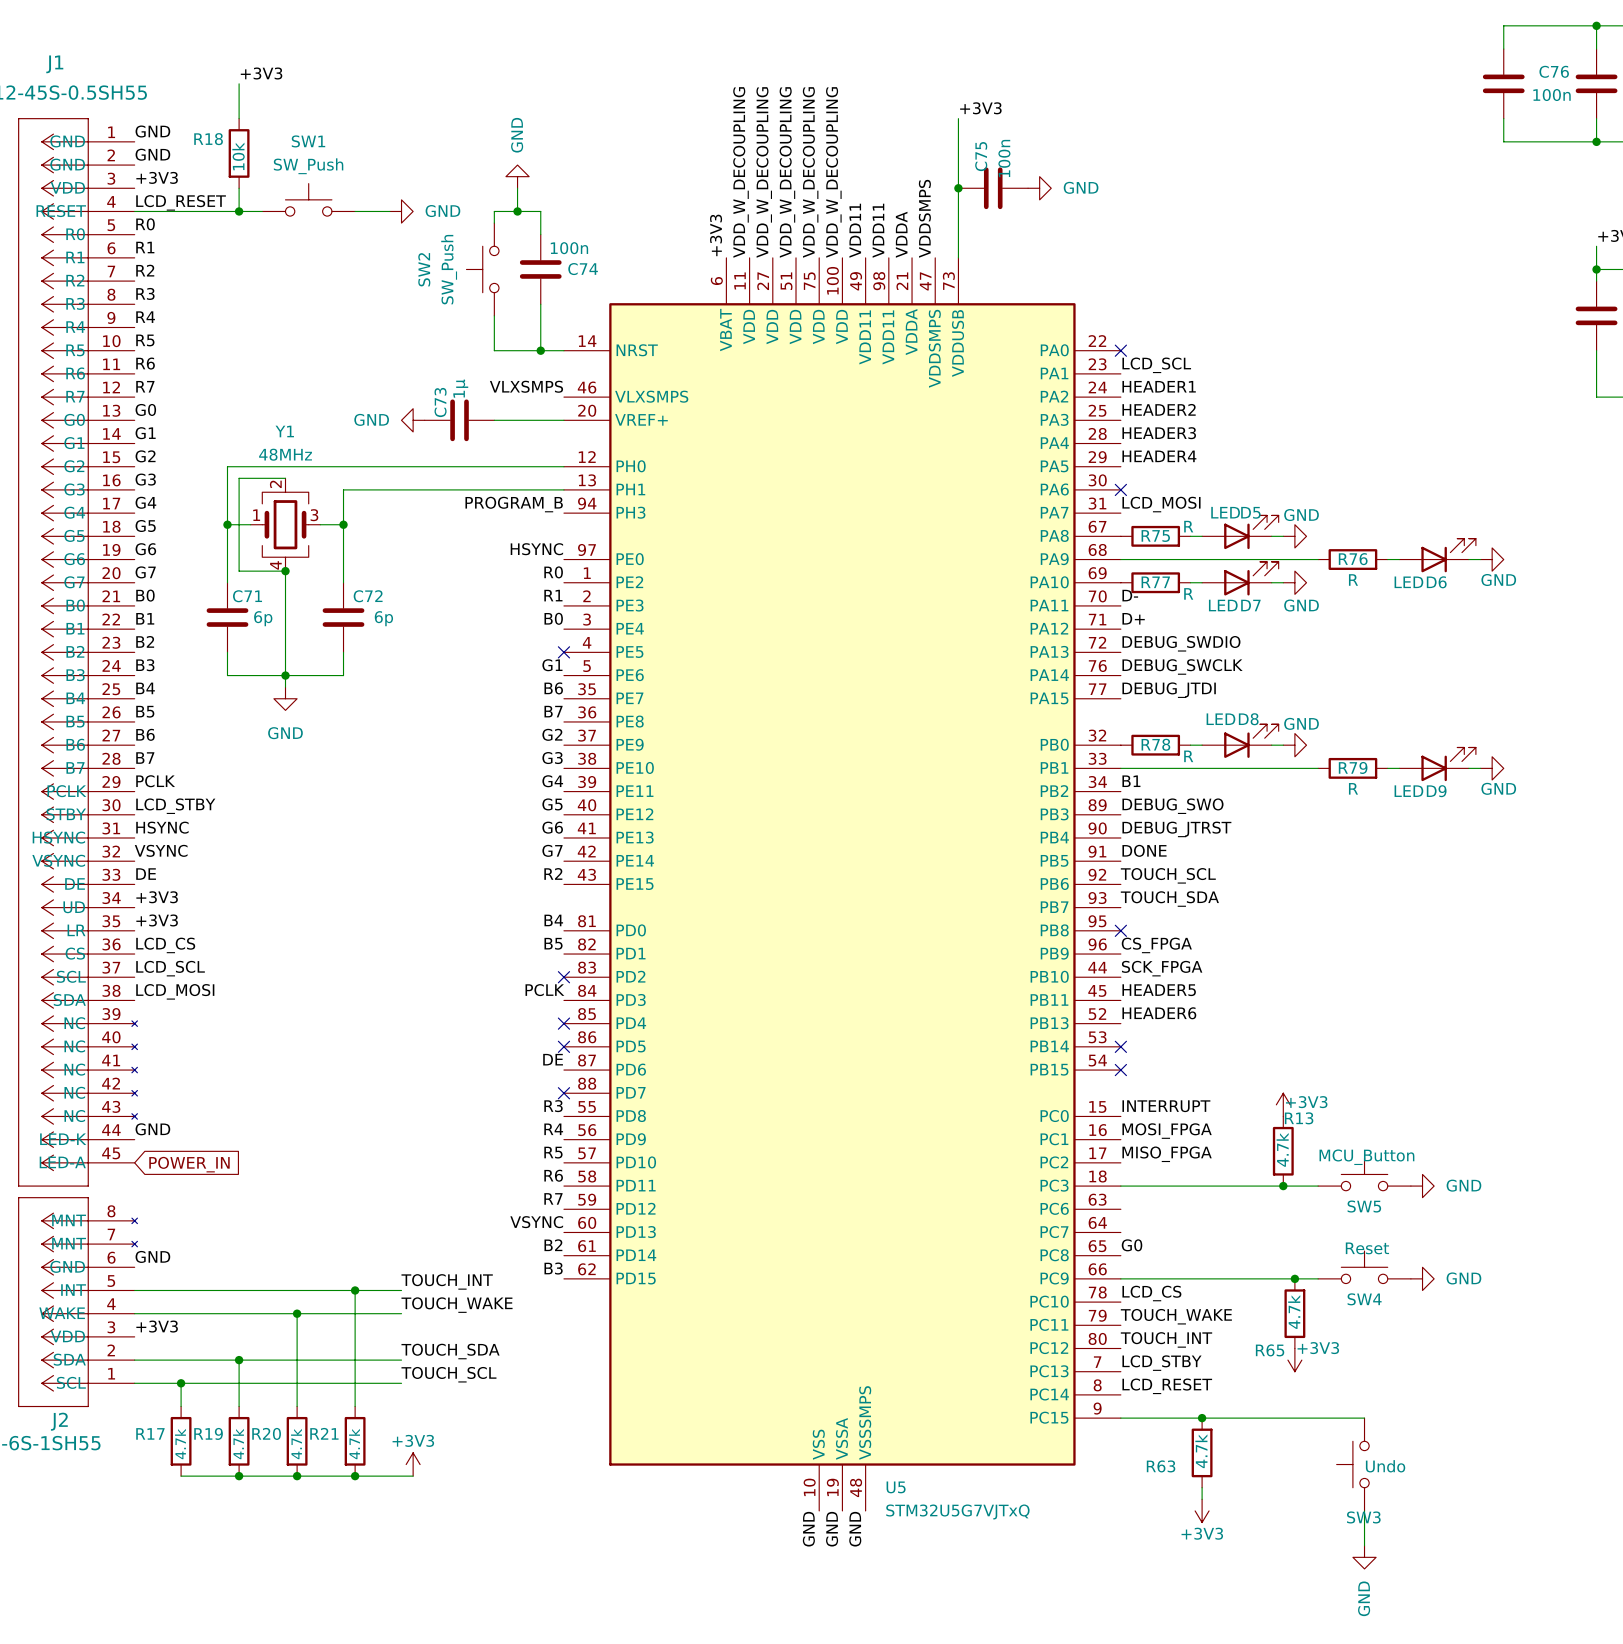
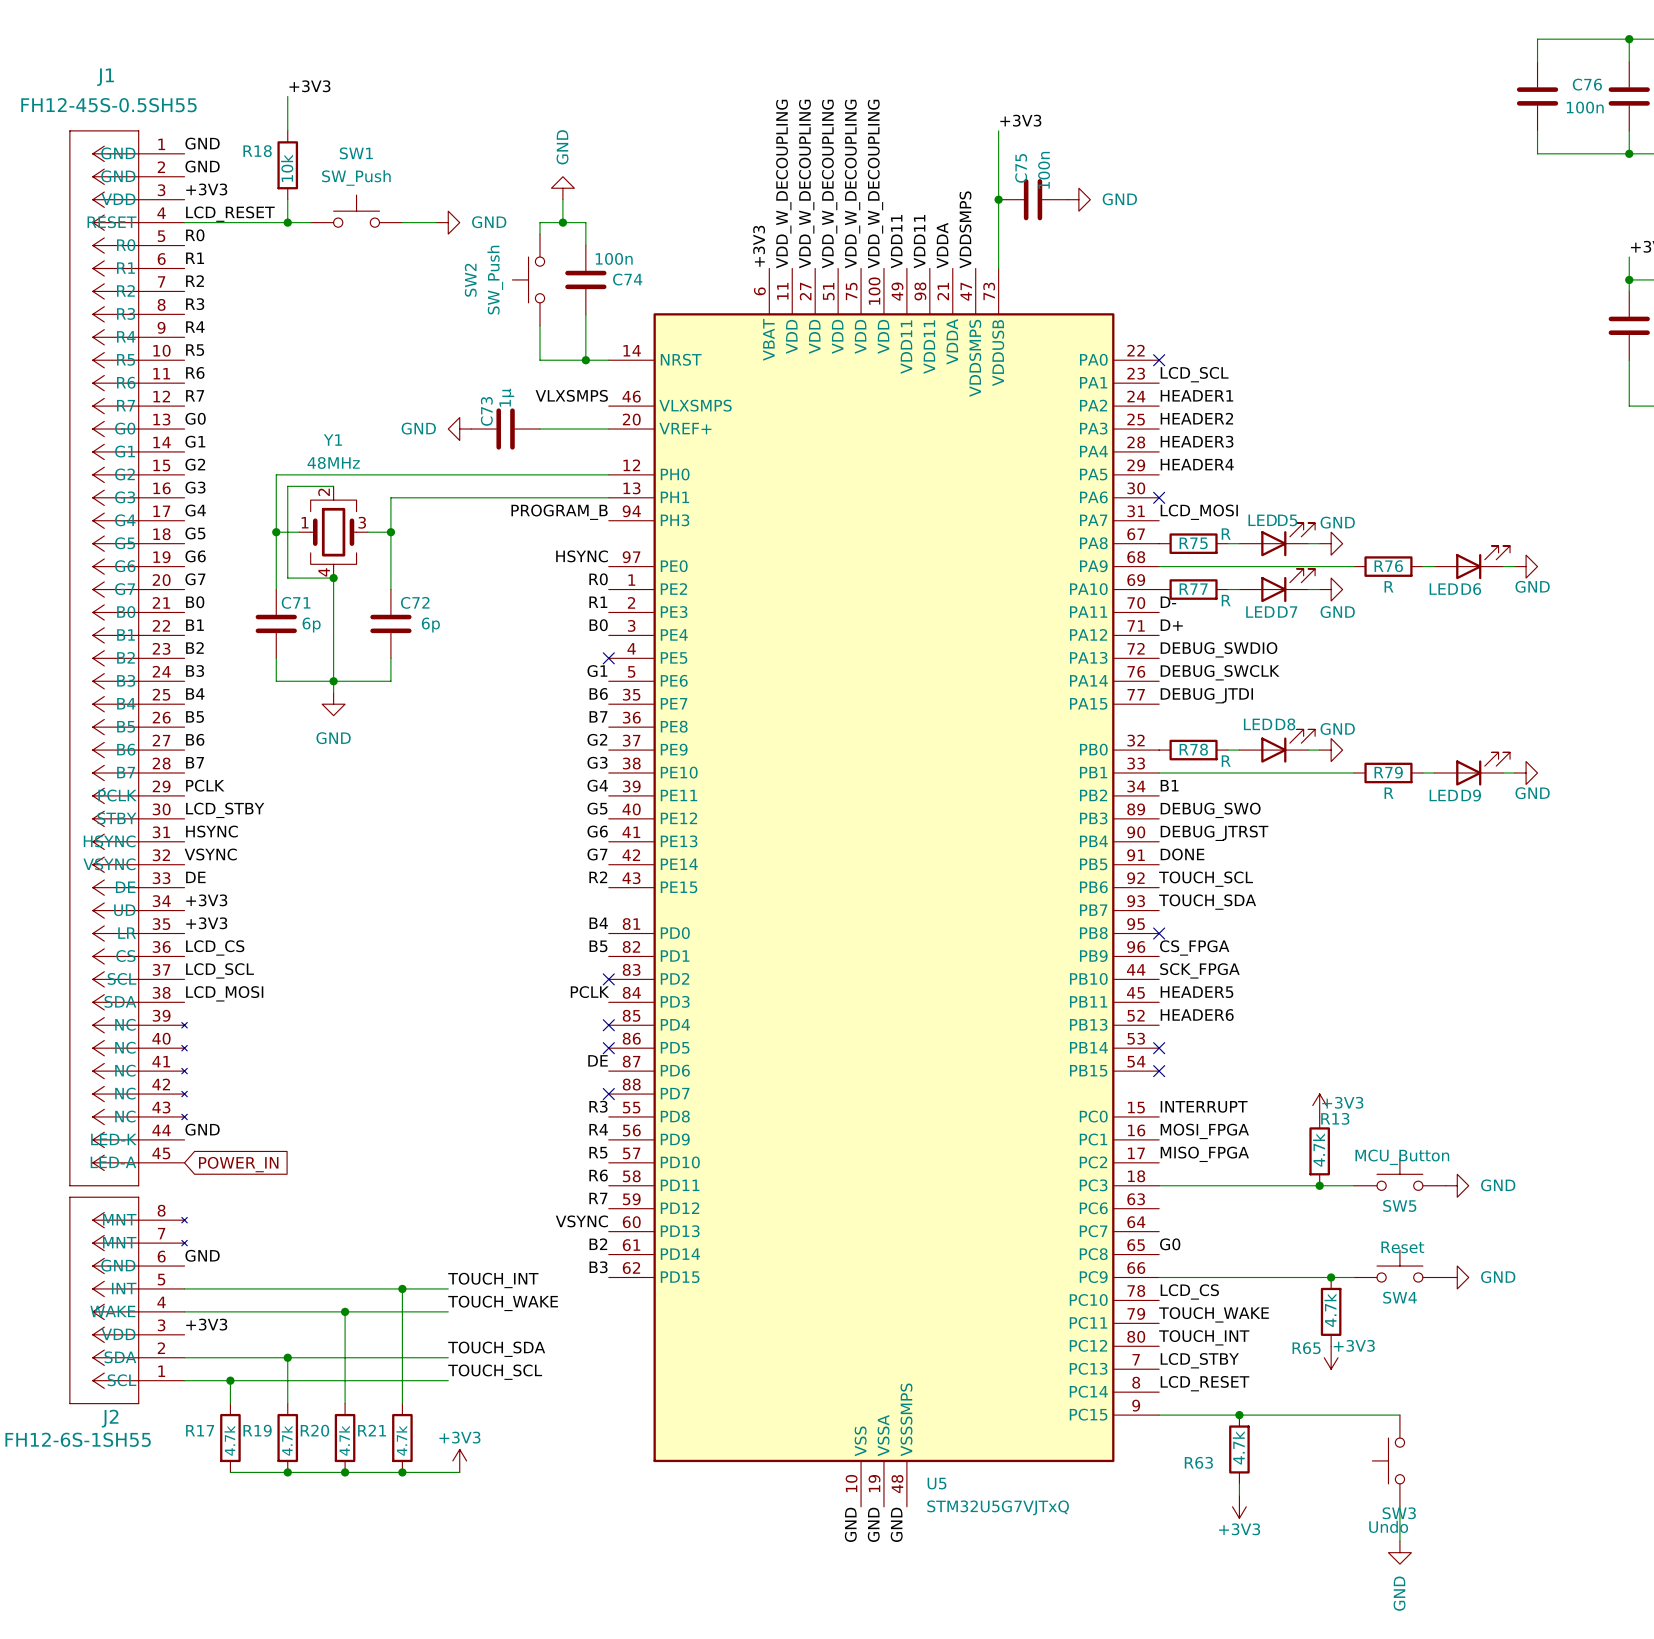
SW3 value position: Undo (1385, 1466) -> Undo (1388, 1526)

